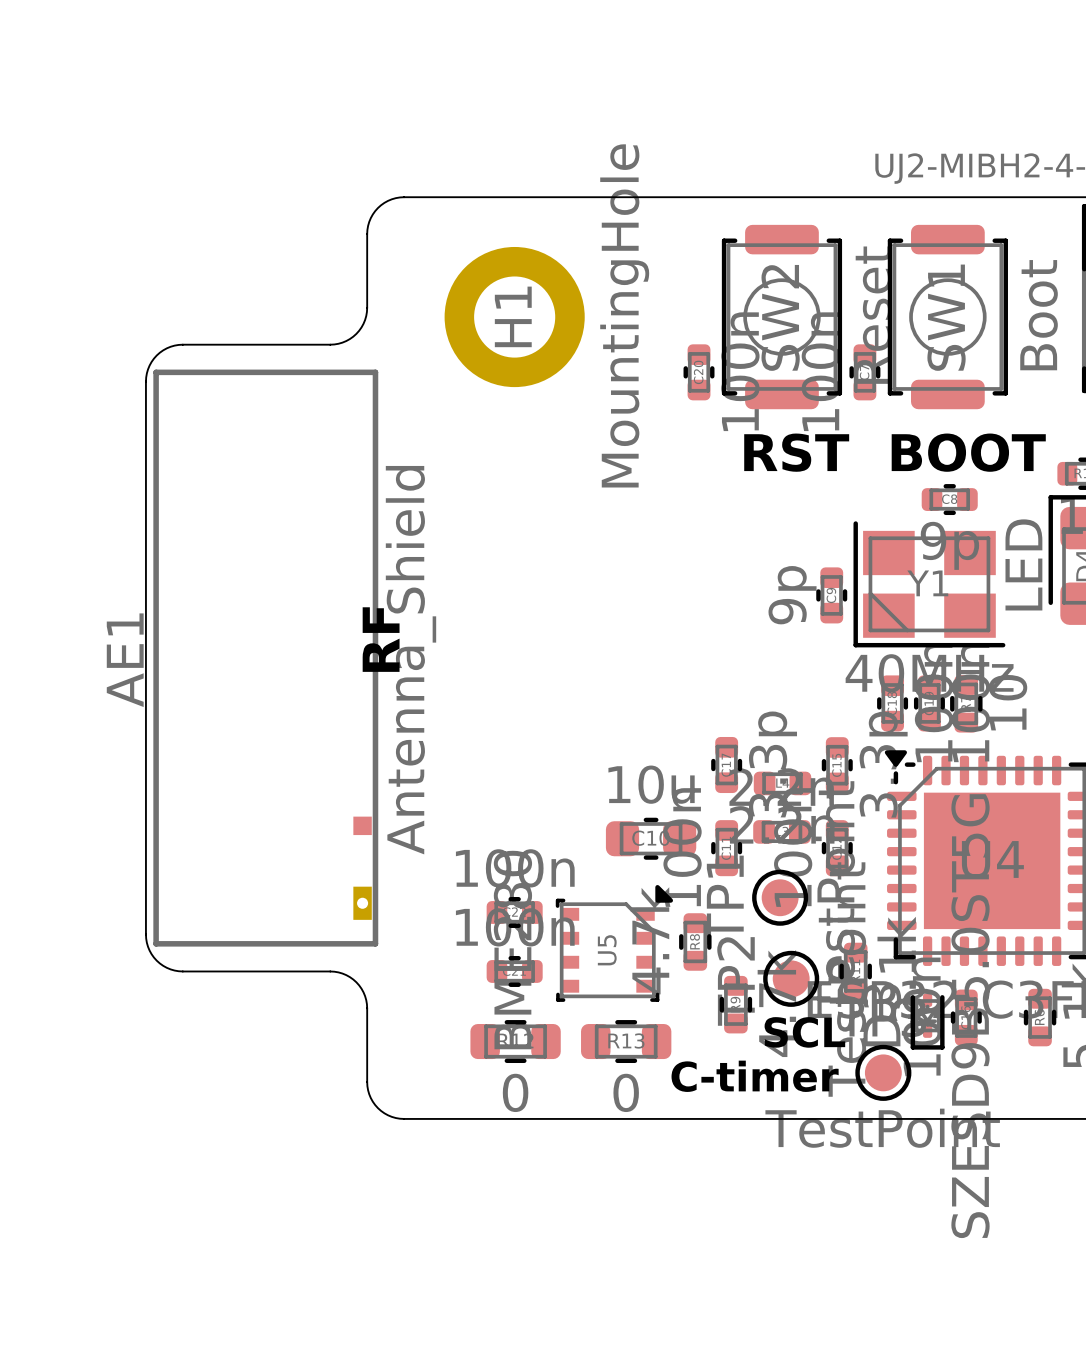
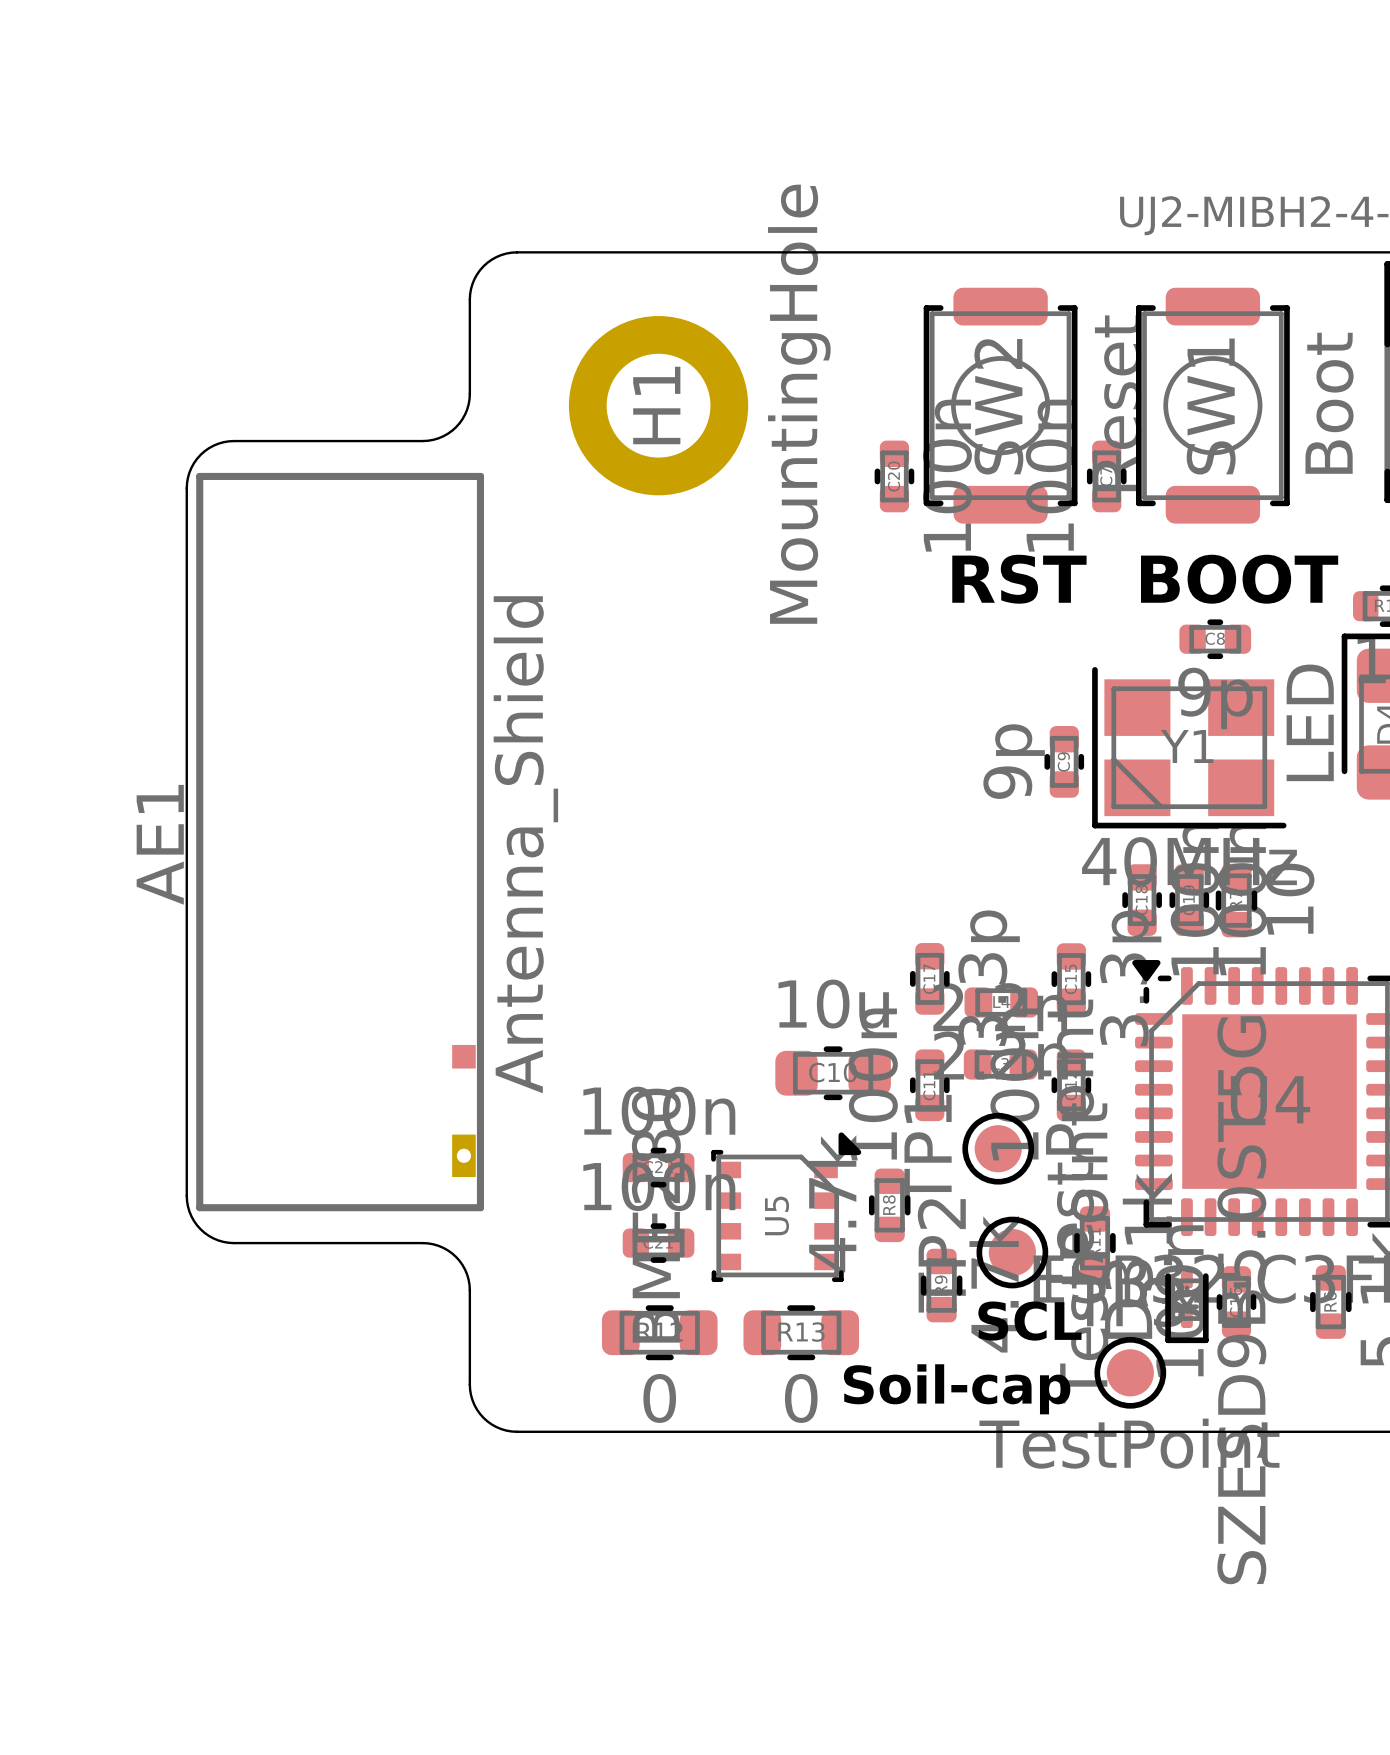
text: RF (381, 639) -> none
text: C-timer (755, 1076) -> Soil-cap (957, 1389)

